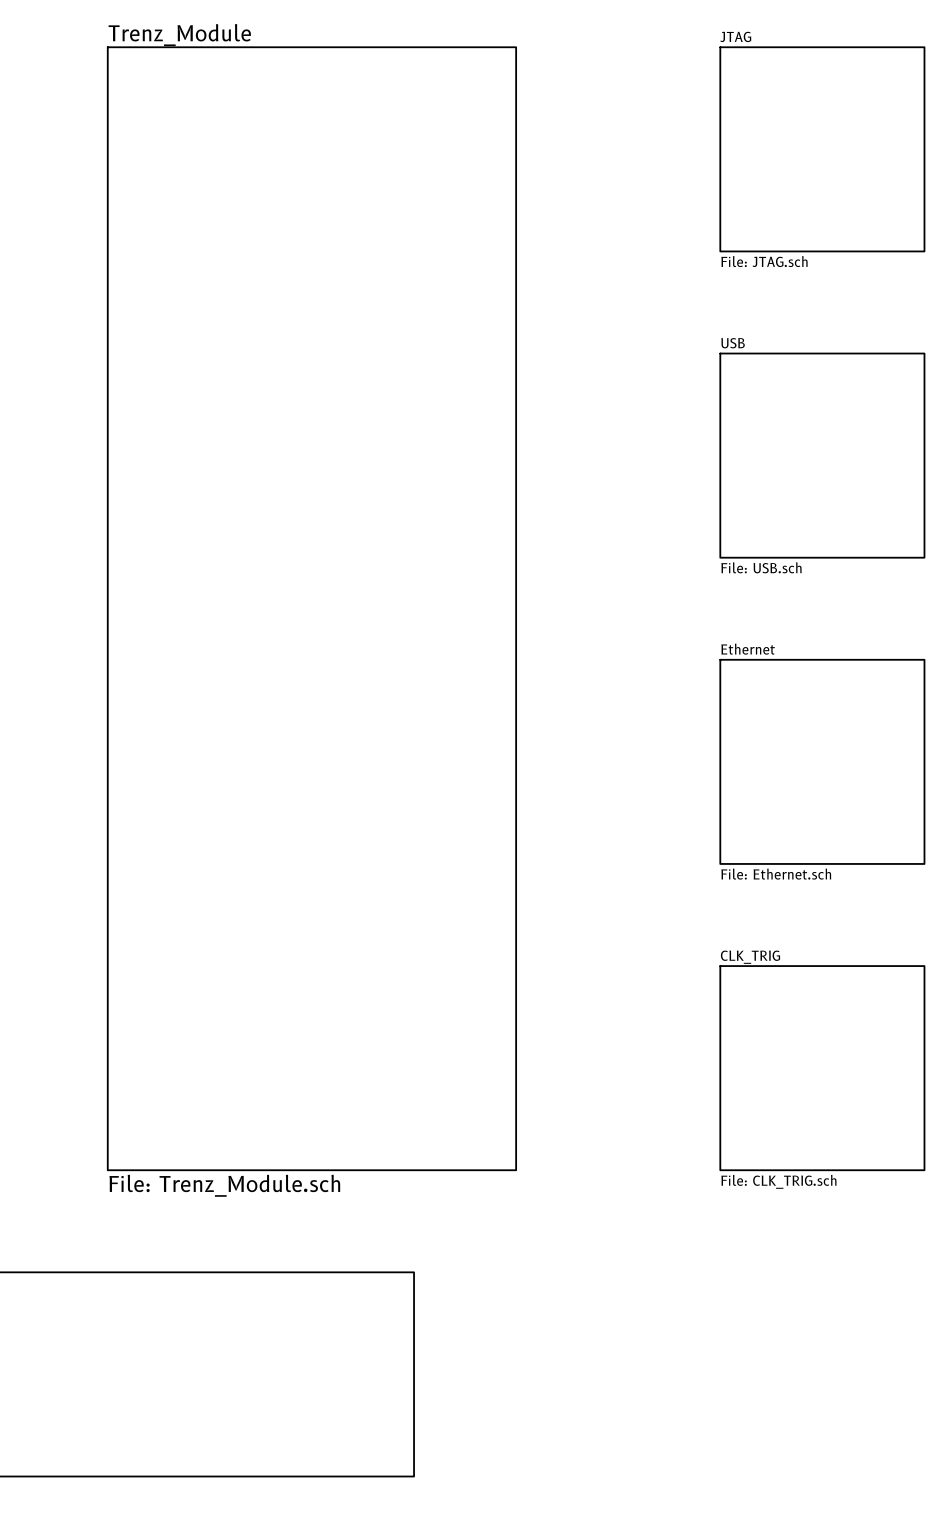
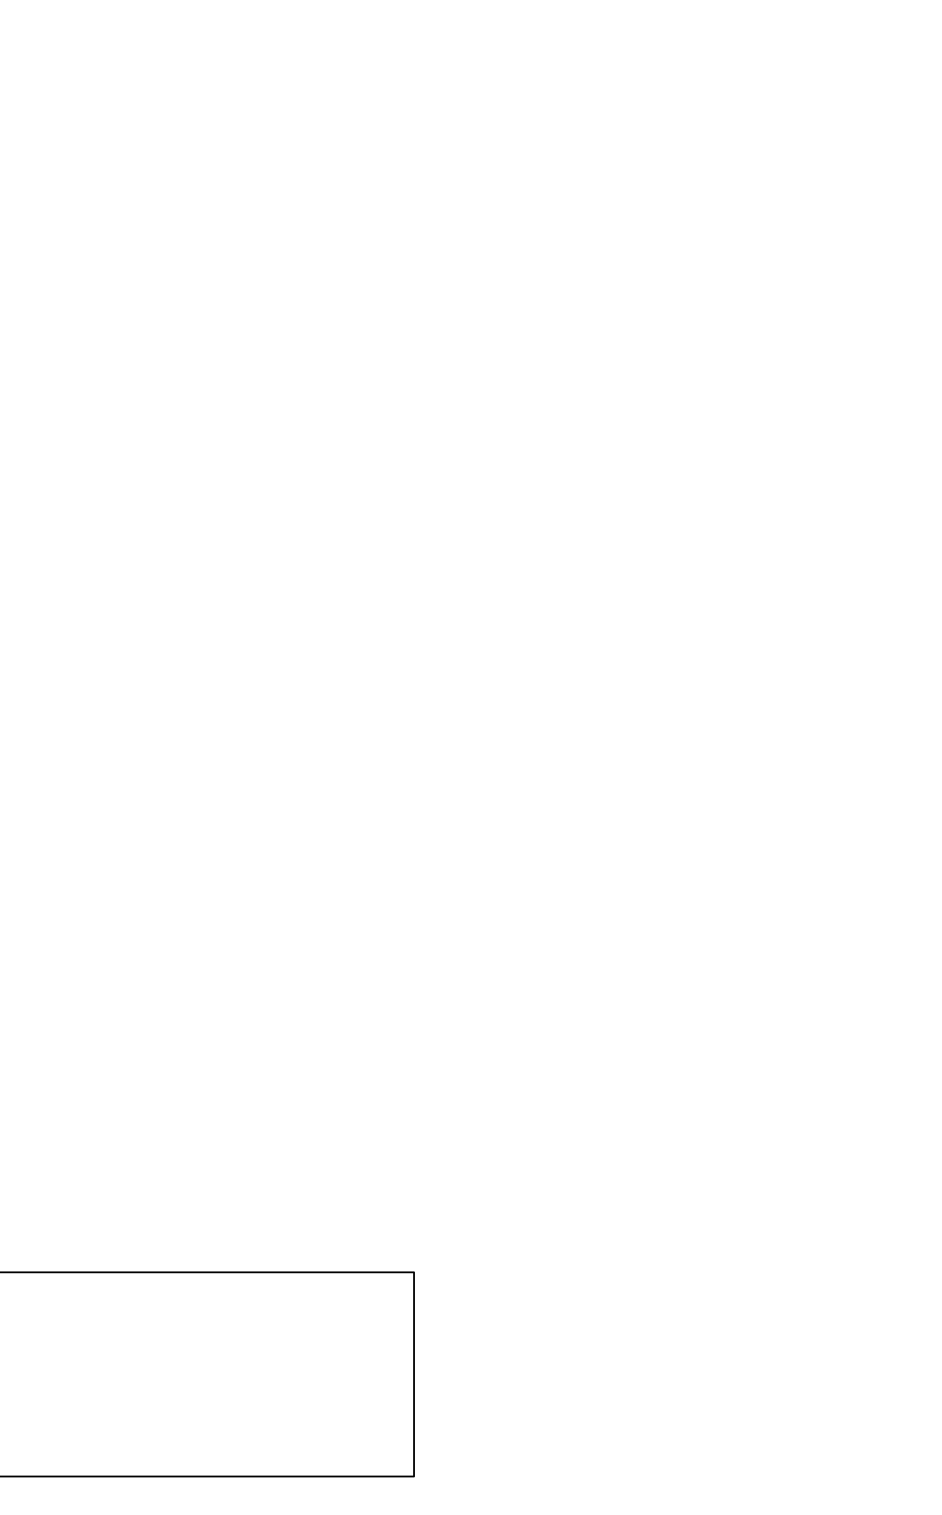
sheet JTAG: File: JTAG.sch (822, 149) -> none
sheet USB: File: USB.sch (822, 455) -> none
sheet Trenz_Module: File: Trenz_Module.sch (311, 608) -> none
sheet Ethernet: File: Ethernet.sch (822, 761) -> none
sheet CLK_TRIG: File: CLK_TRIG.sch (822, 1068) -> none

